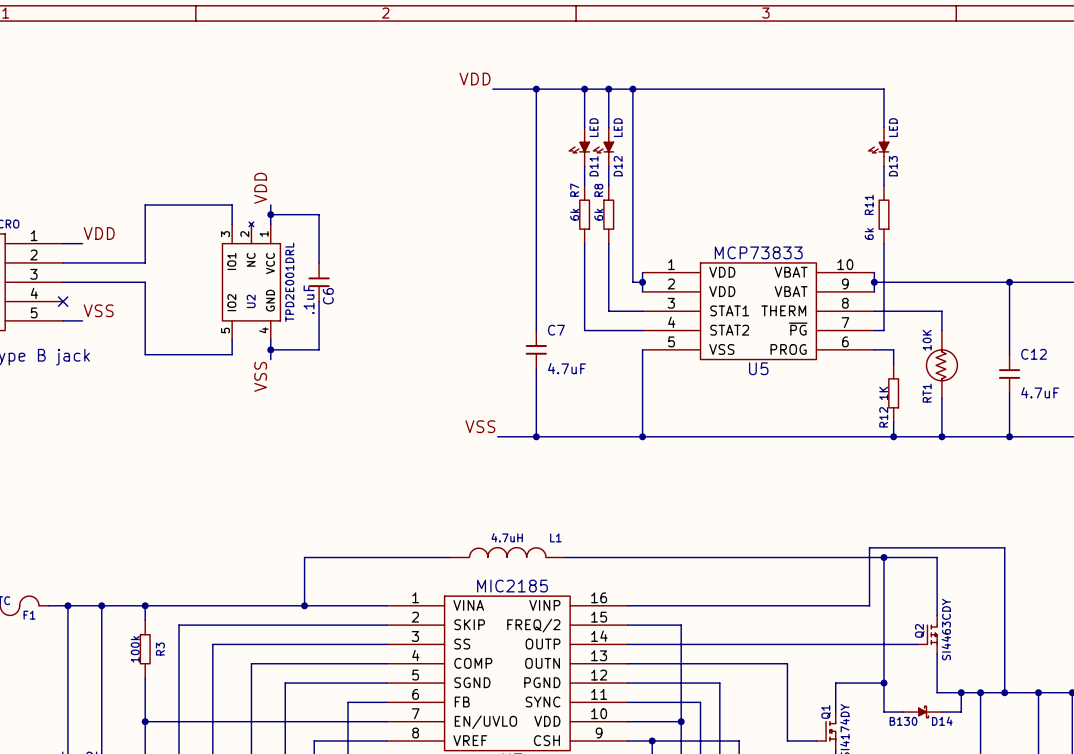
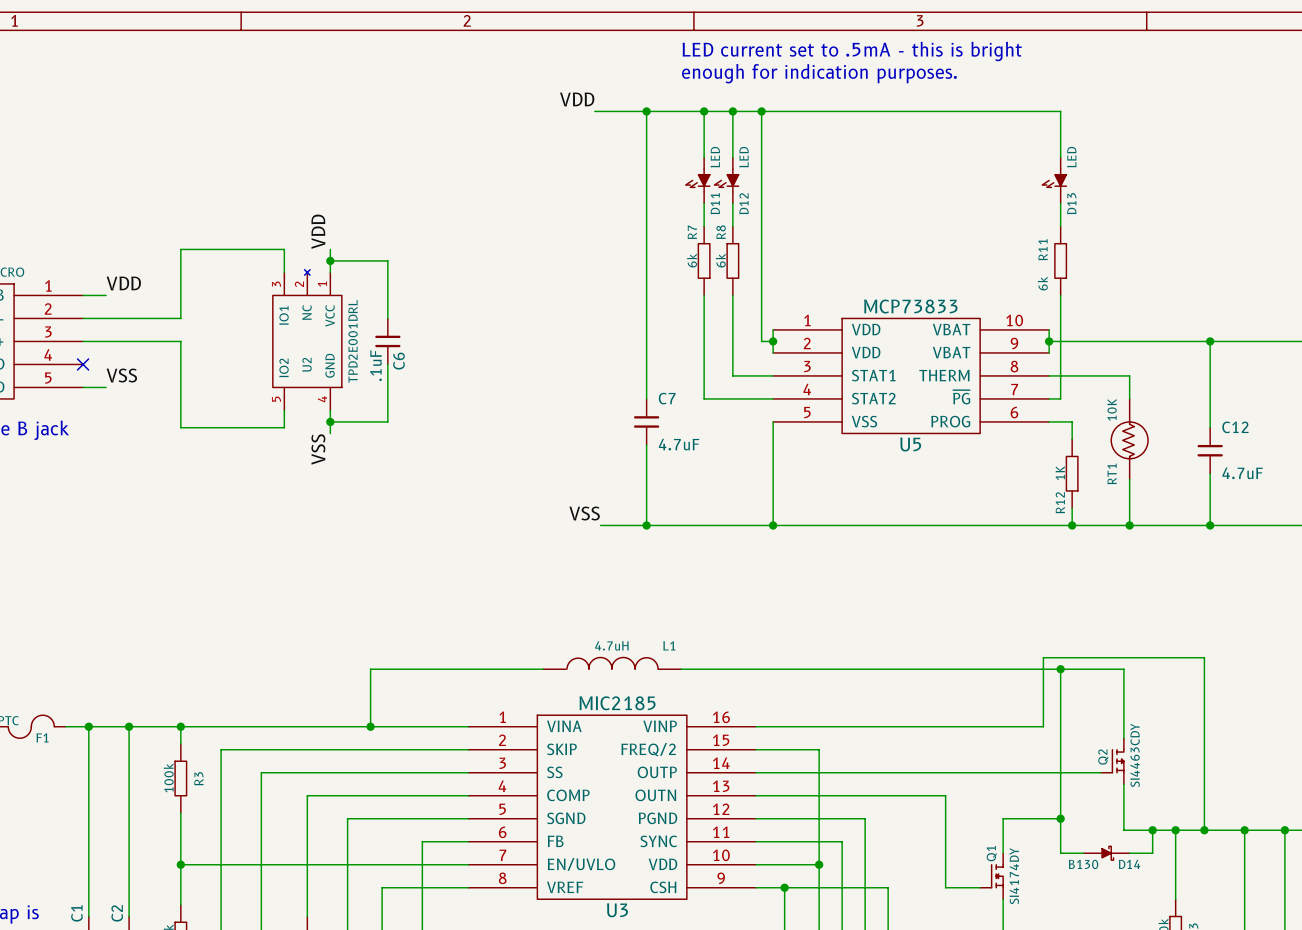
text: none -> LED current set to .5mA - this is bright (852, 51)
text: none -> enough for indication purposes. (819, 73)

